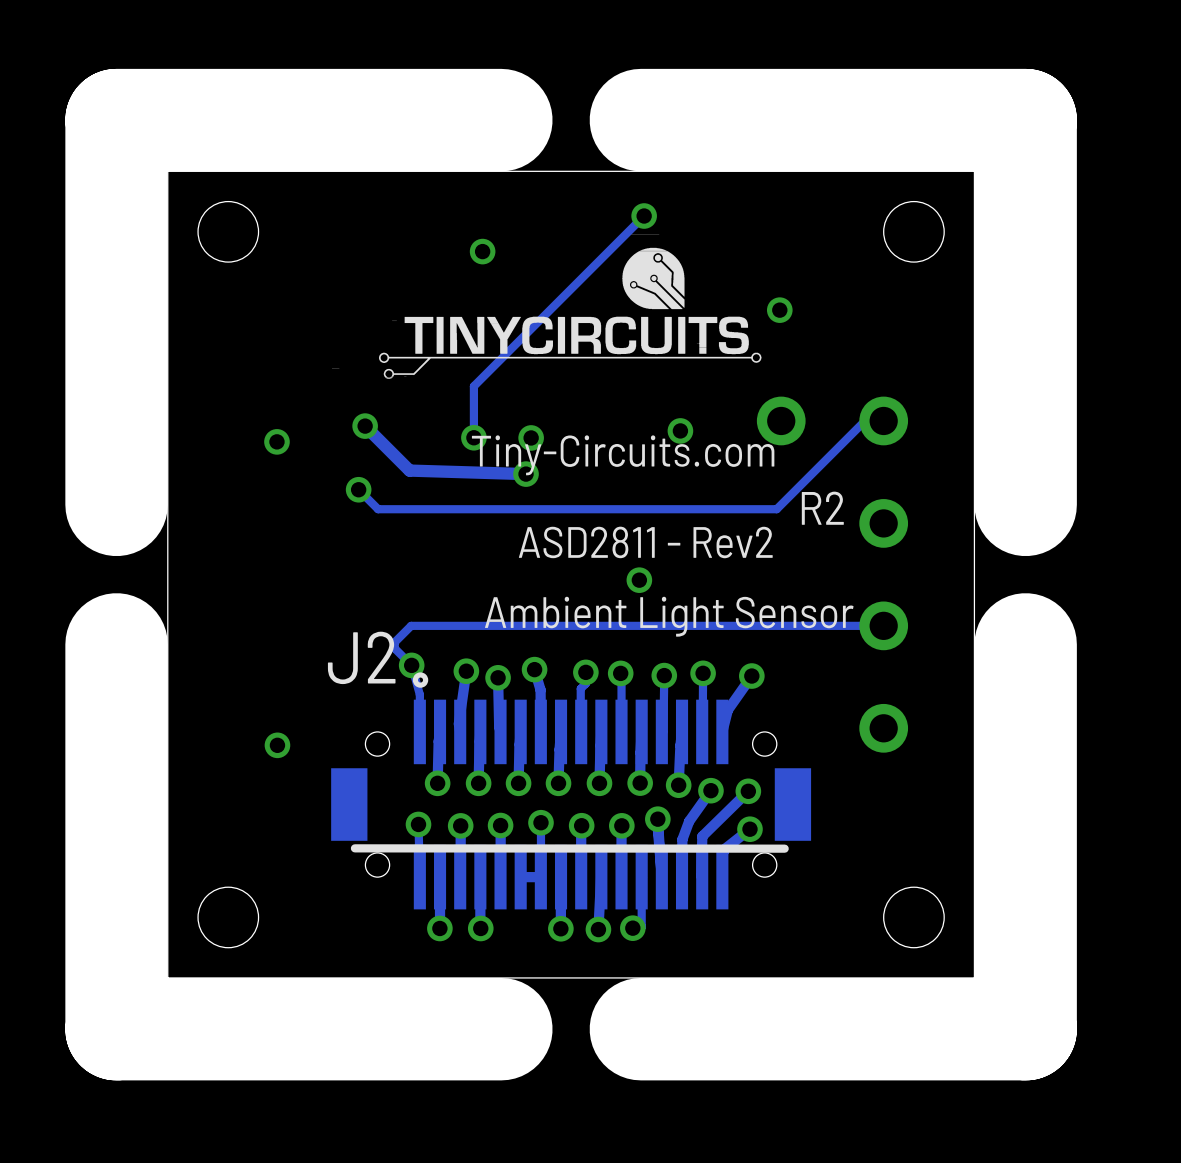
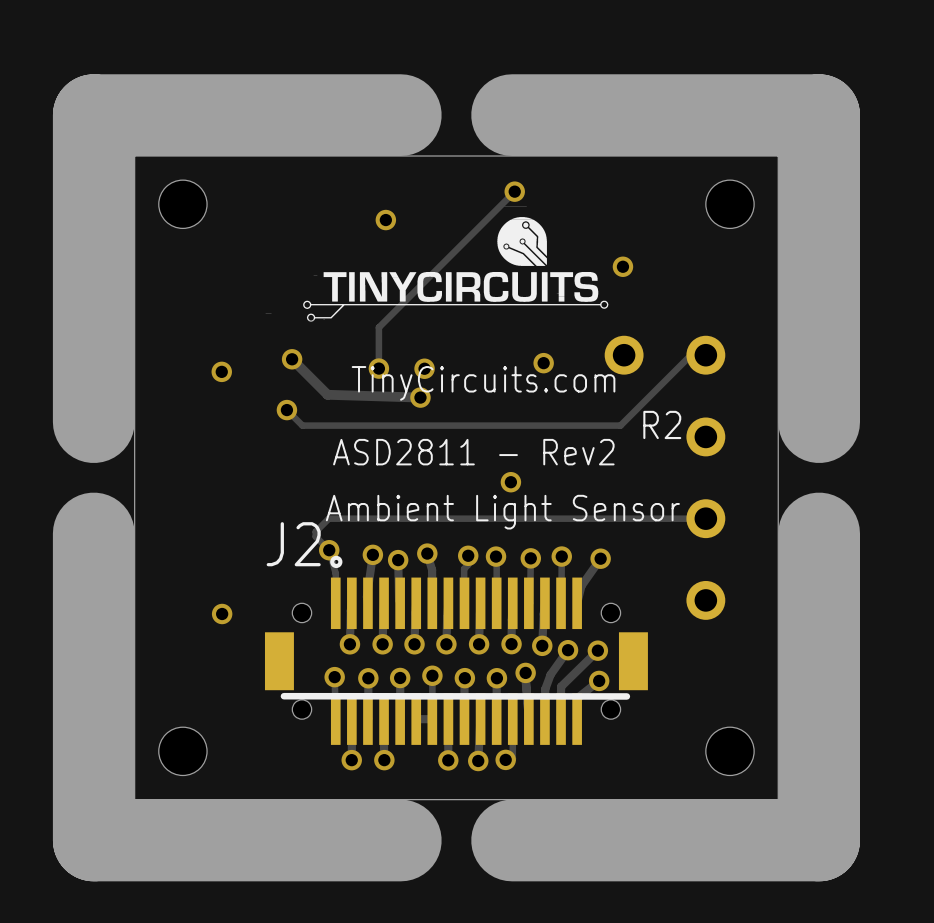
text: Tiny-Circuits.com (623, 455) -> TinyCircuits.com (483, 383)

